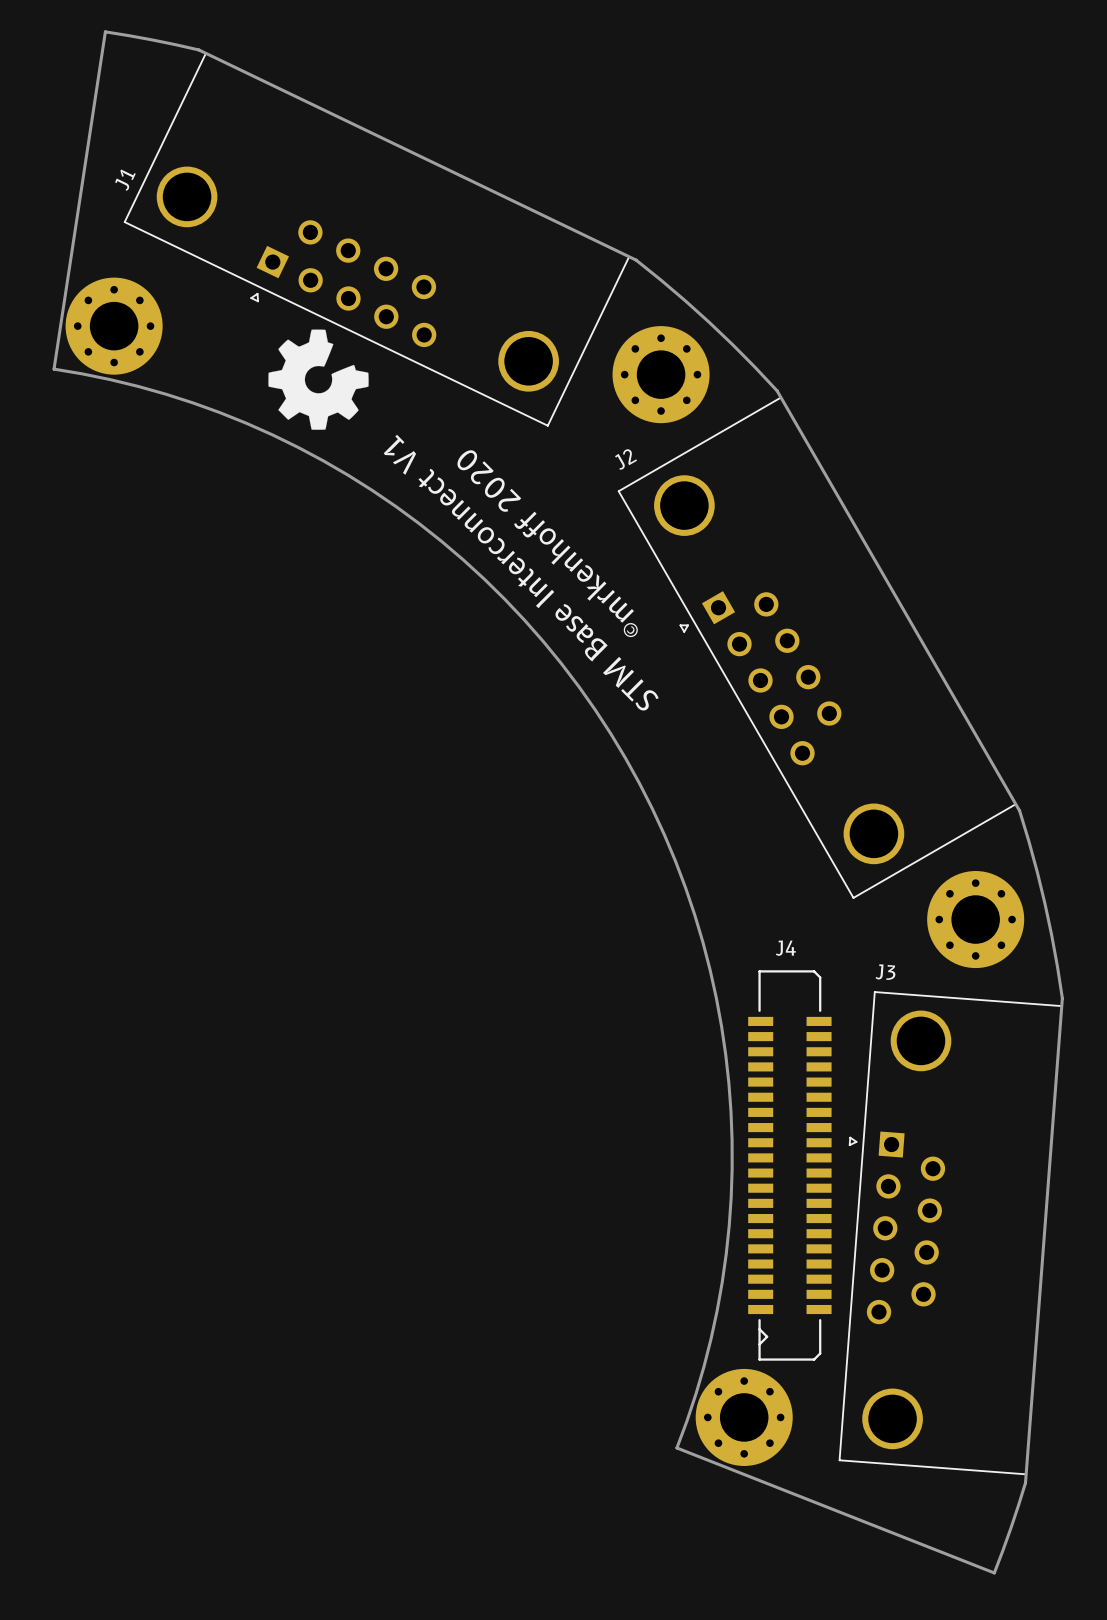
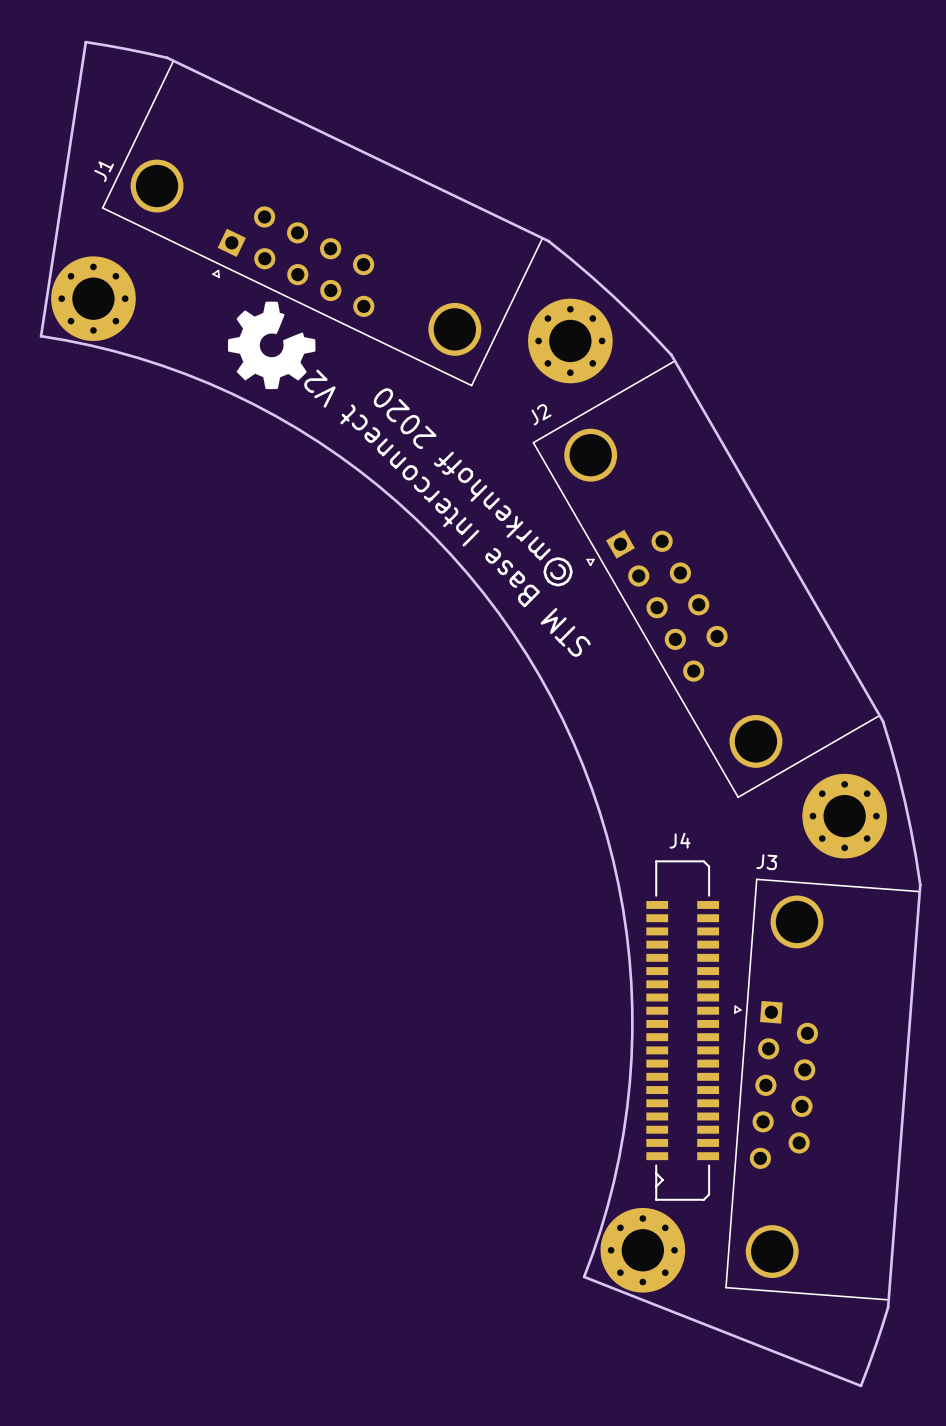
text: STM Base Interconnect V1 (521, 572) -> STM Base Interconnect V2 (447, 513)

